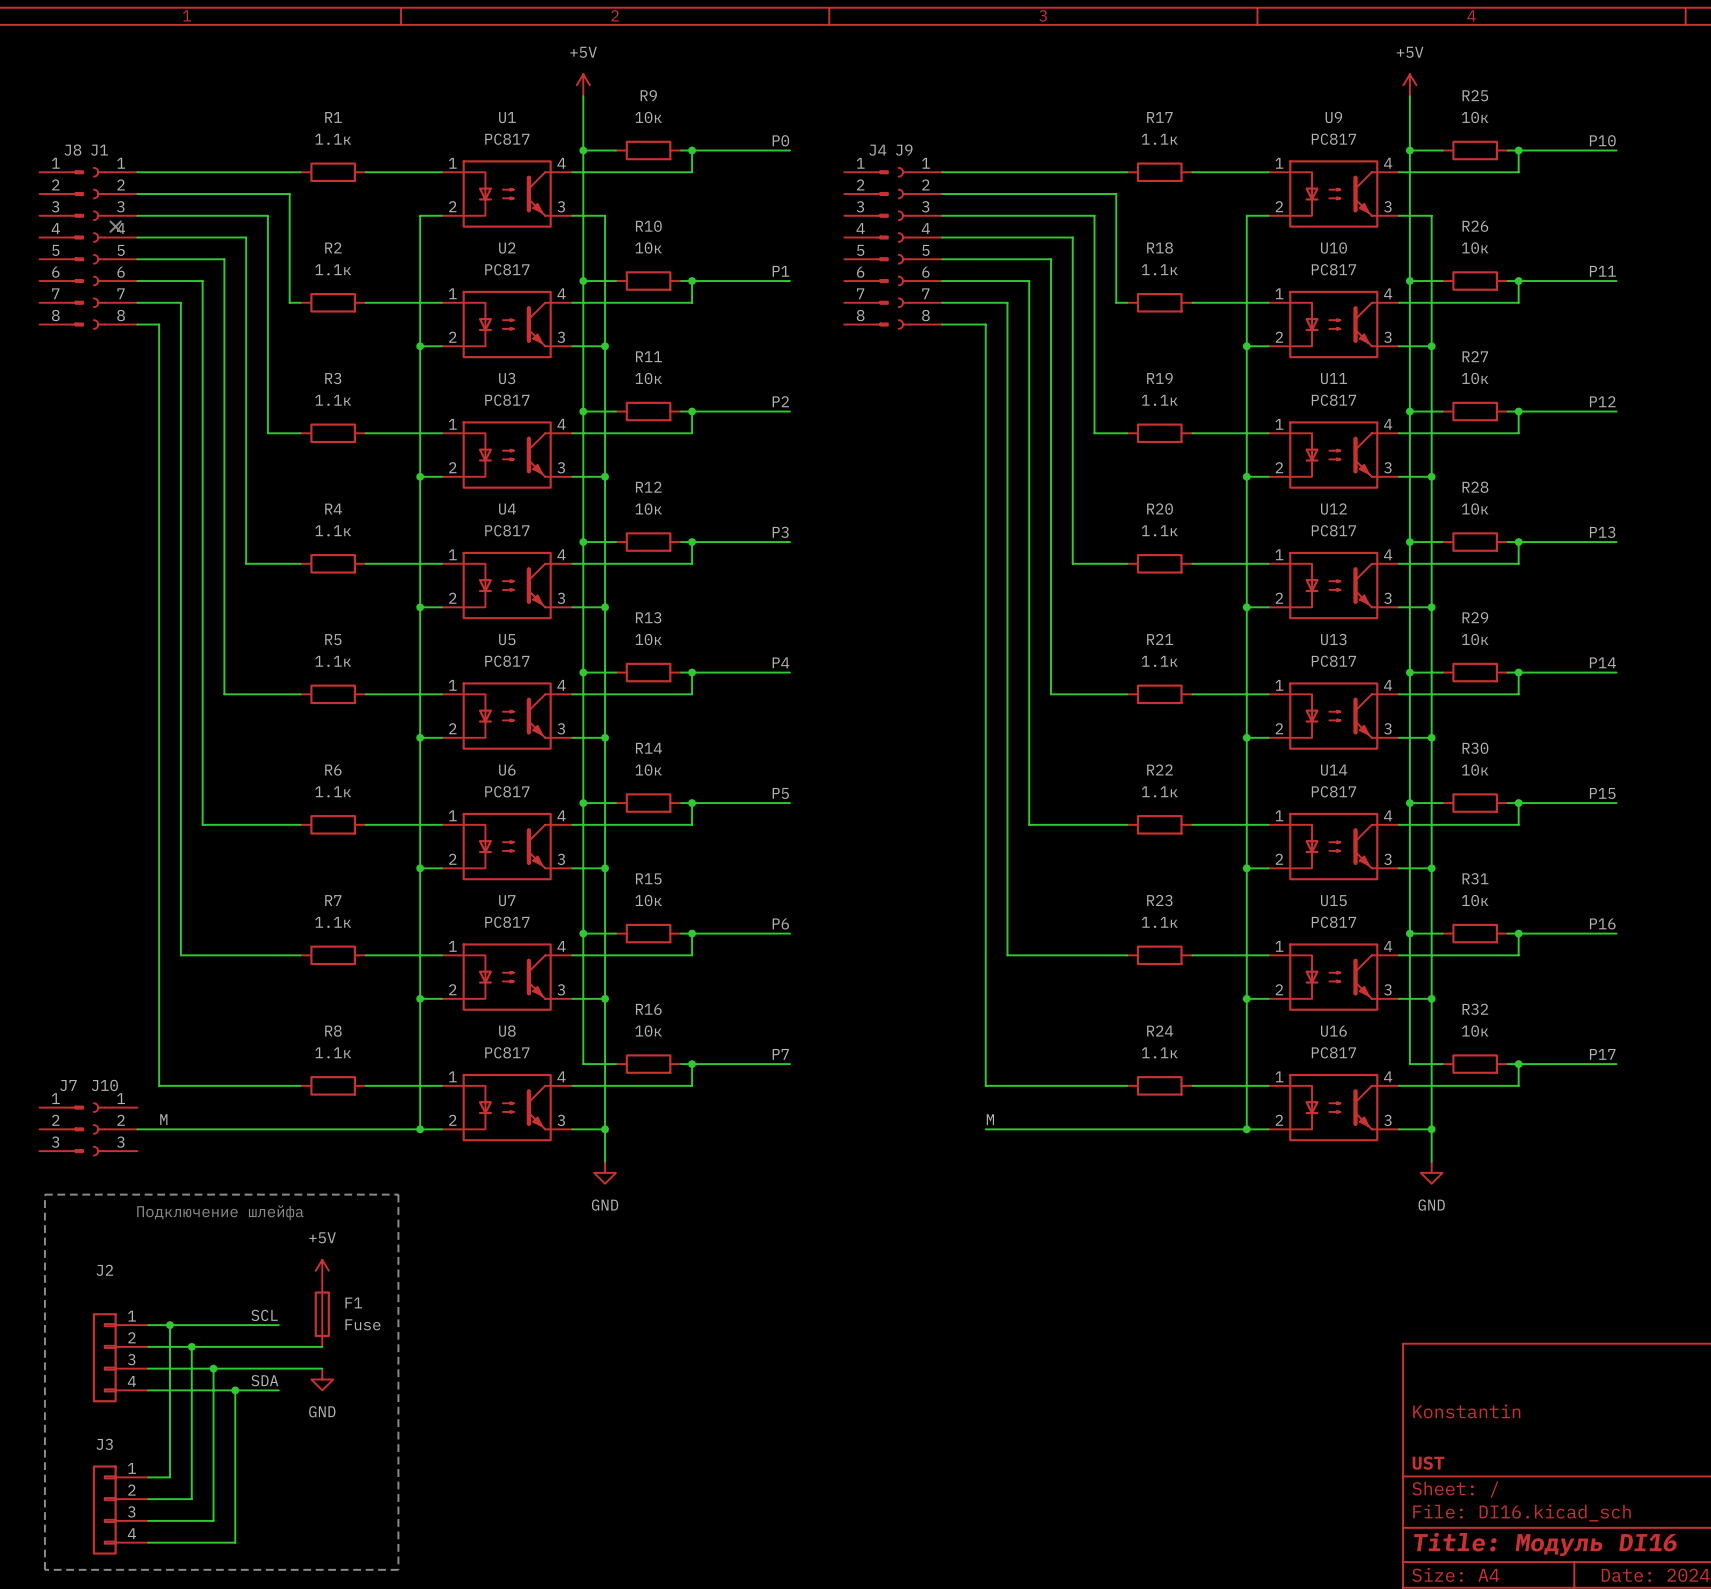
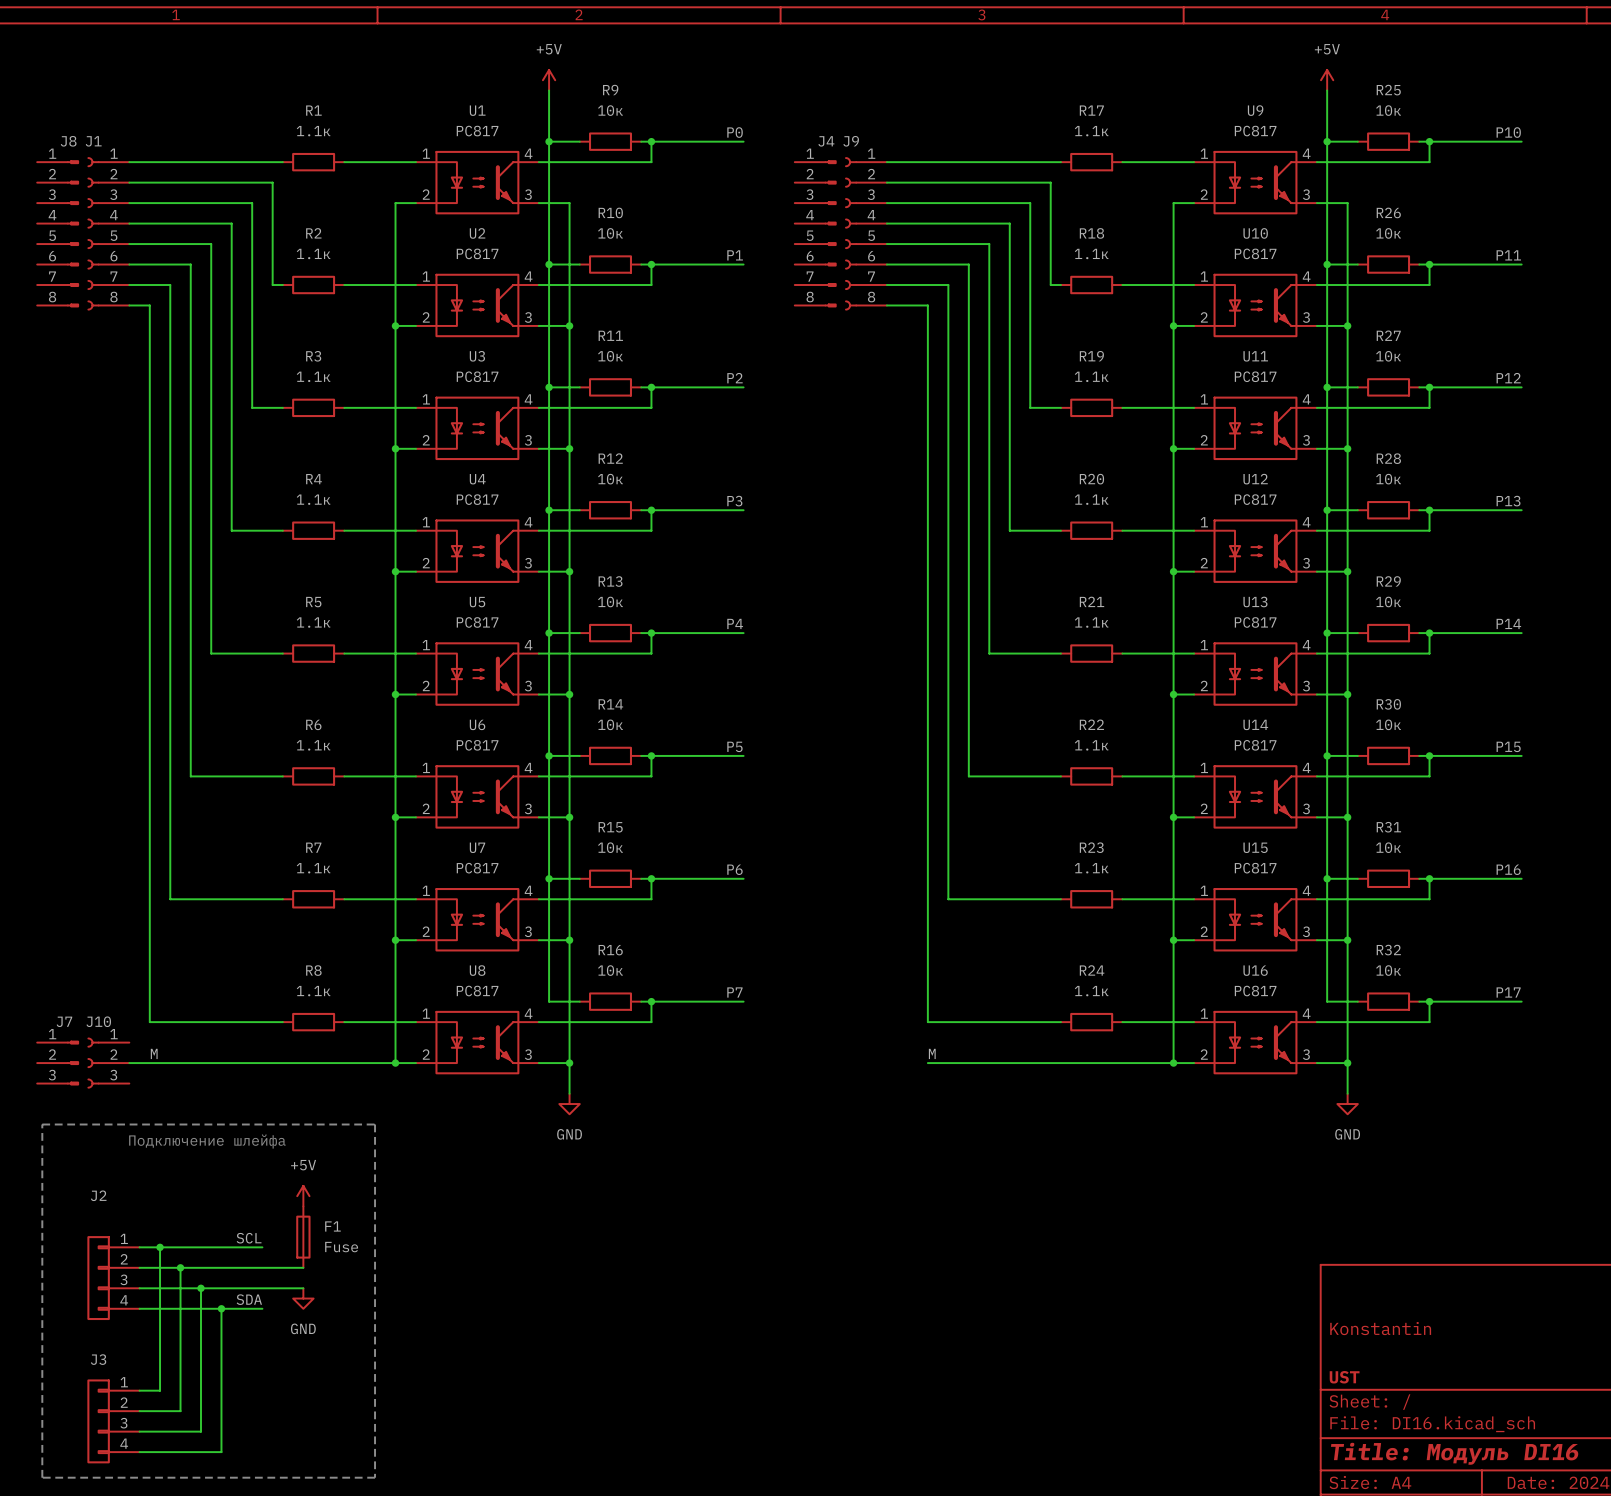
no-connect mark: (115, 226) -> none

